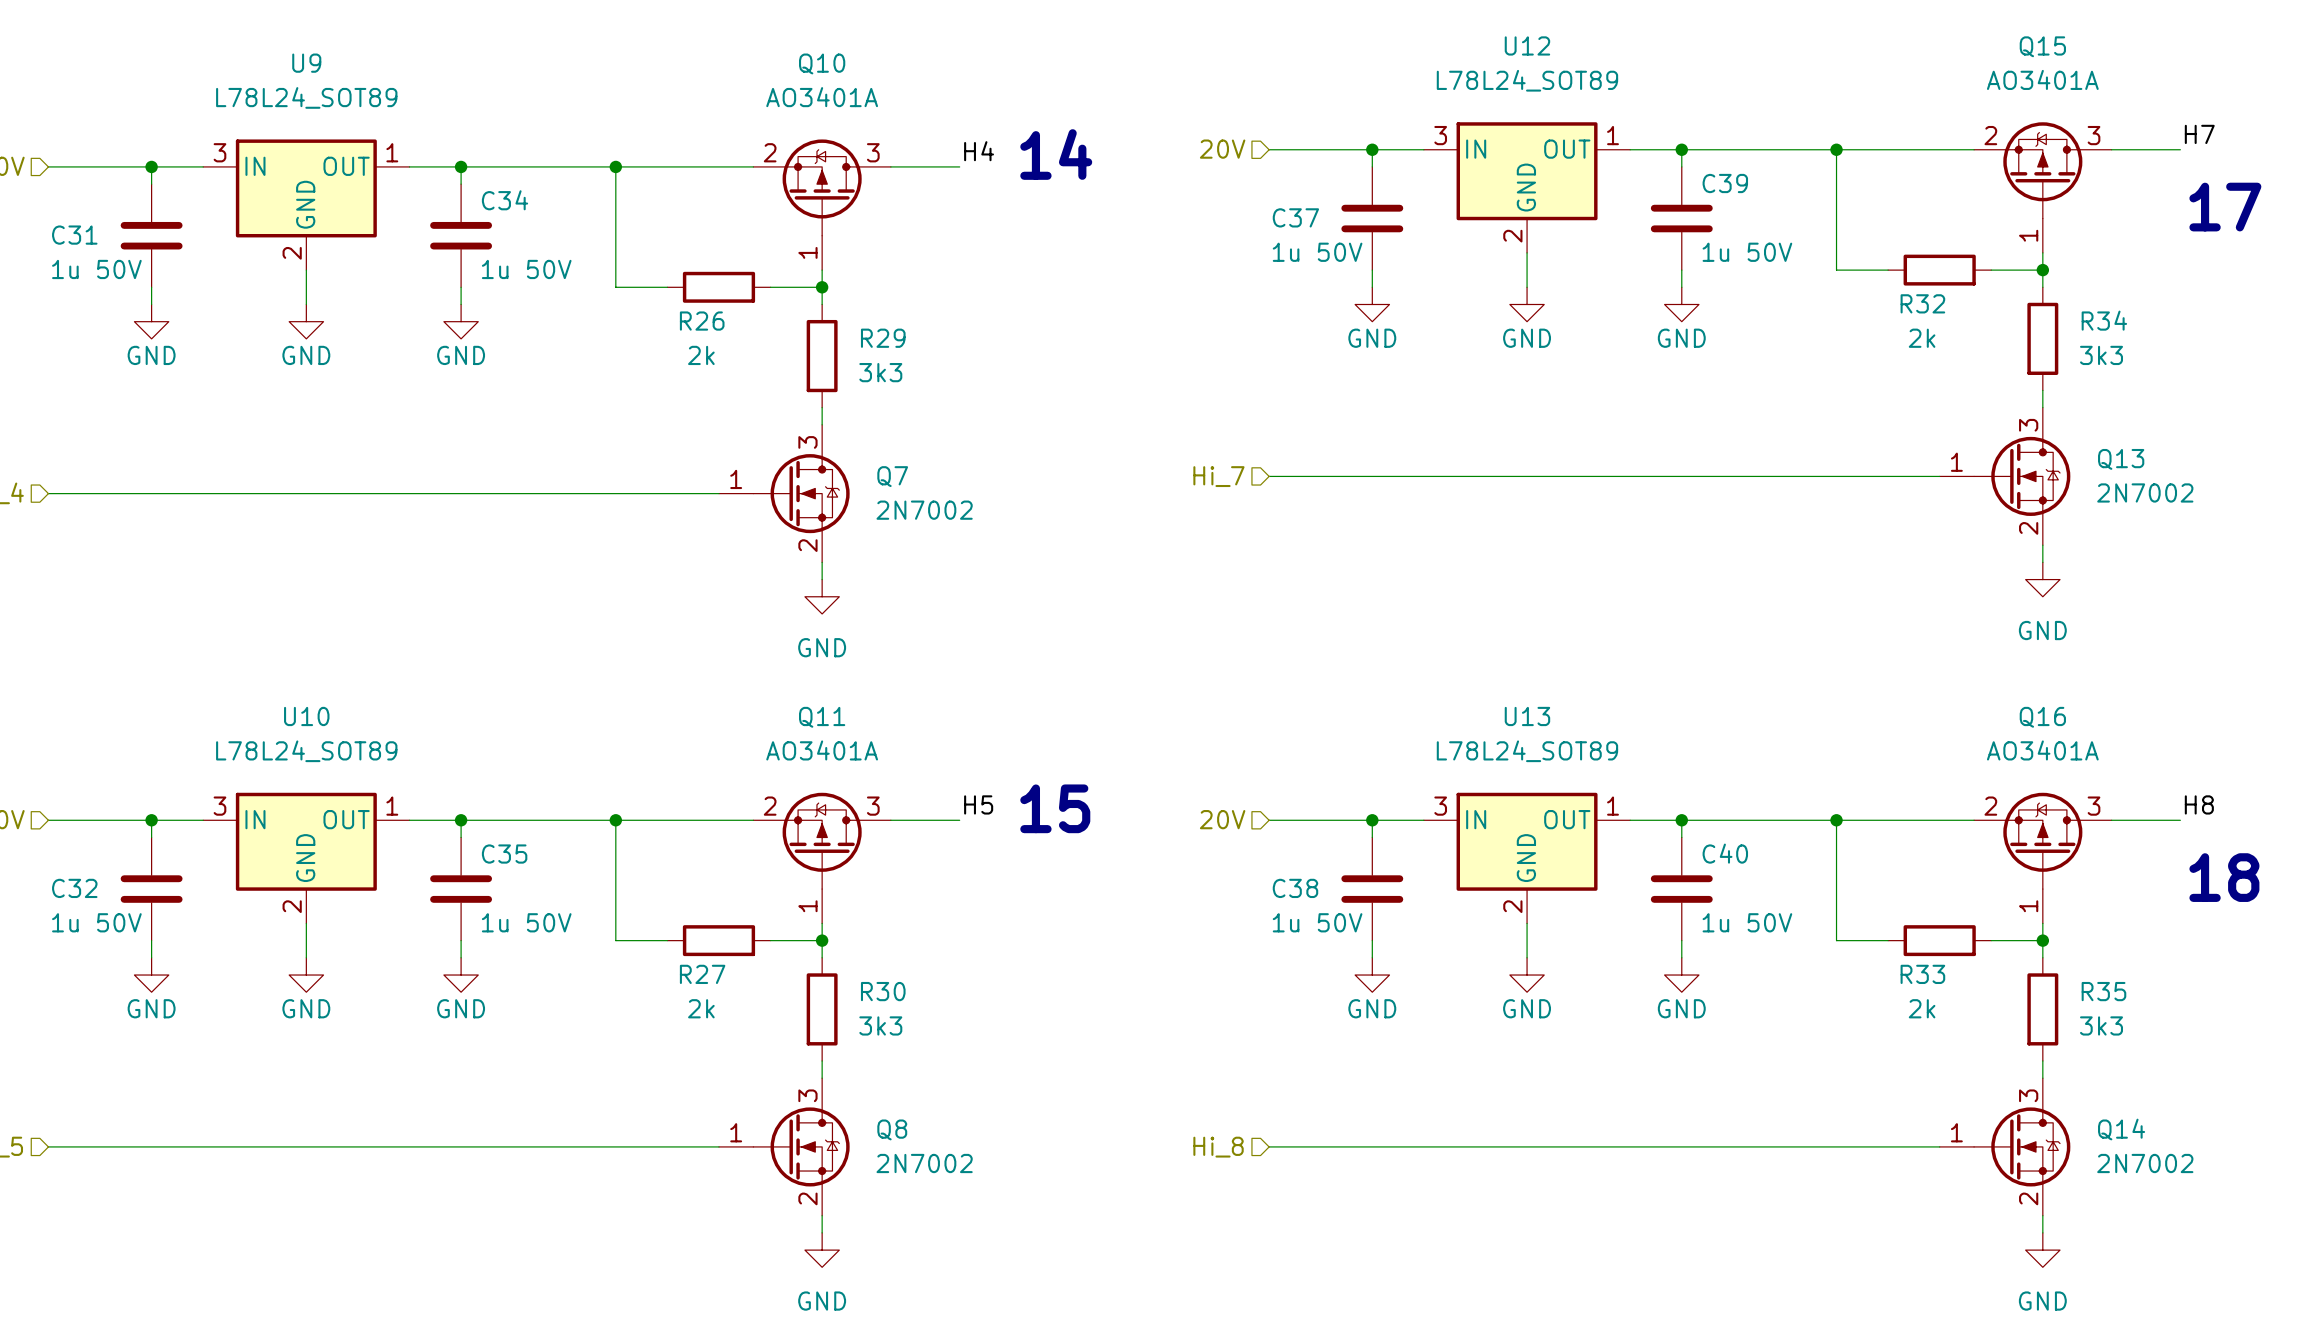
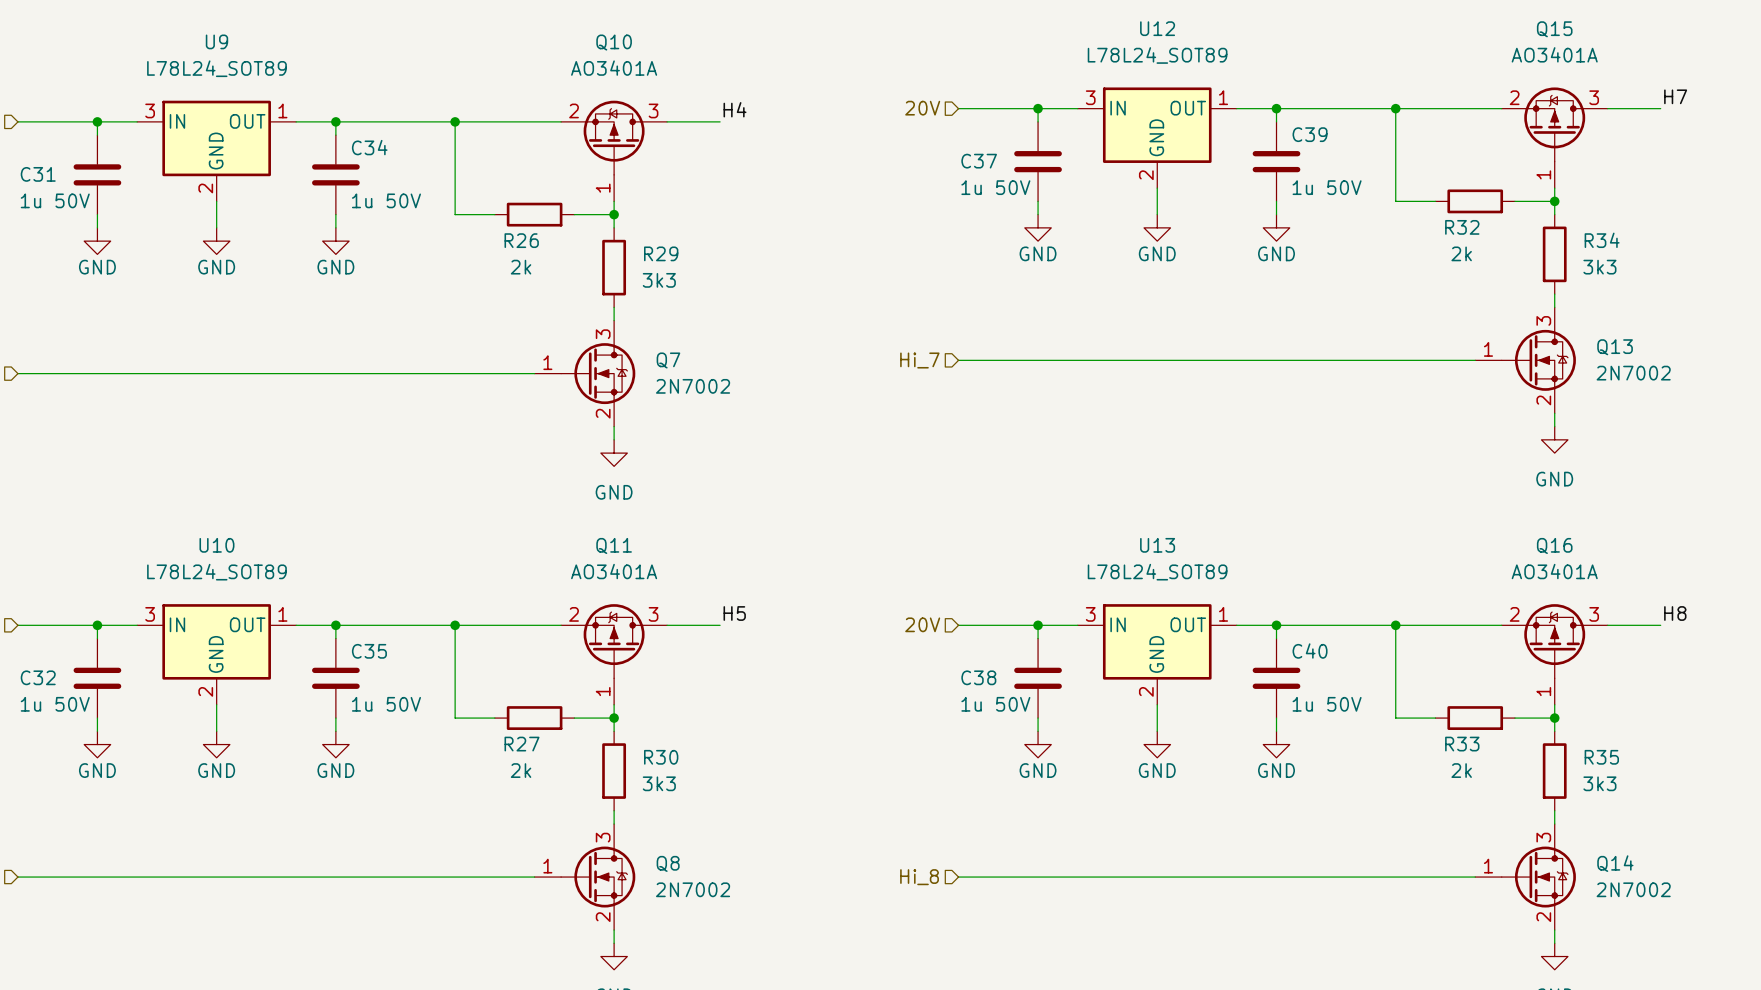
text: 14 (1056, 154) -> none
text: 17 (2225, 207) -> none
text: 15 (1055, 808) -> none
text: 18 (2224, 877) -> none

